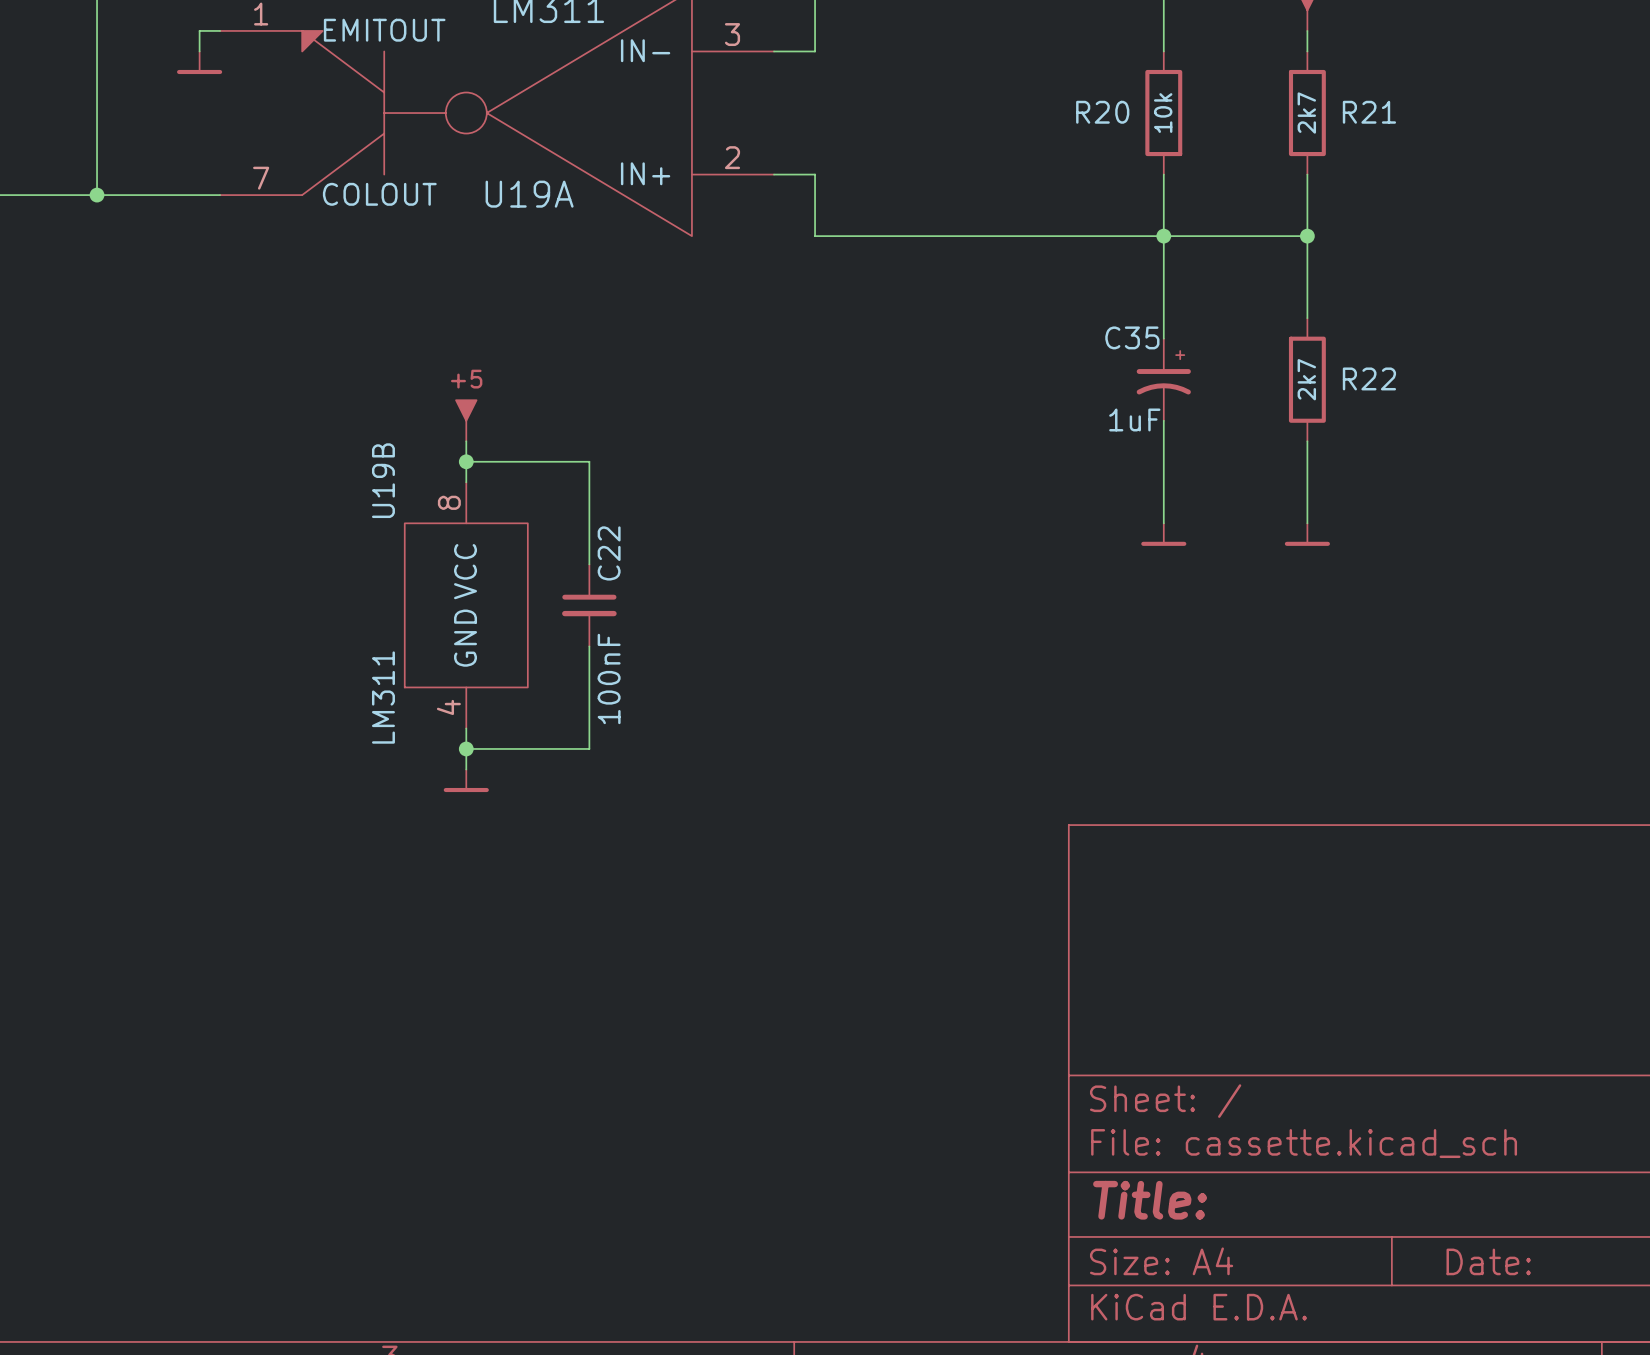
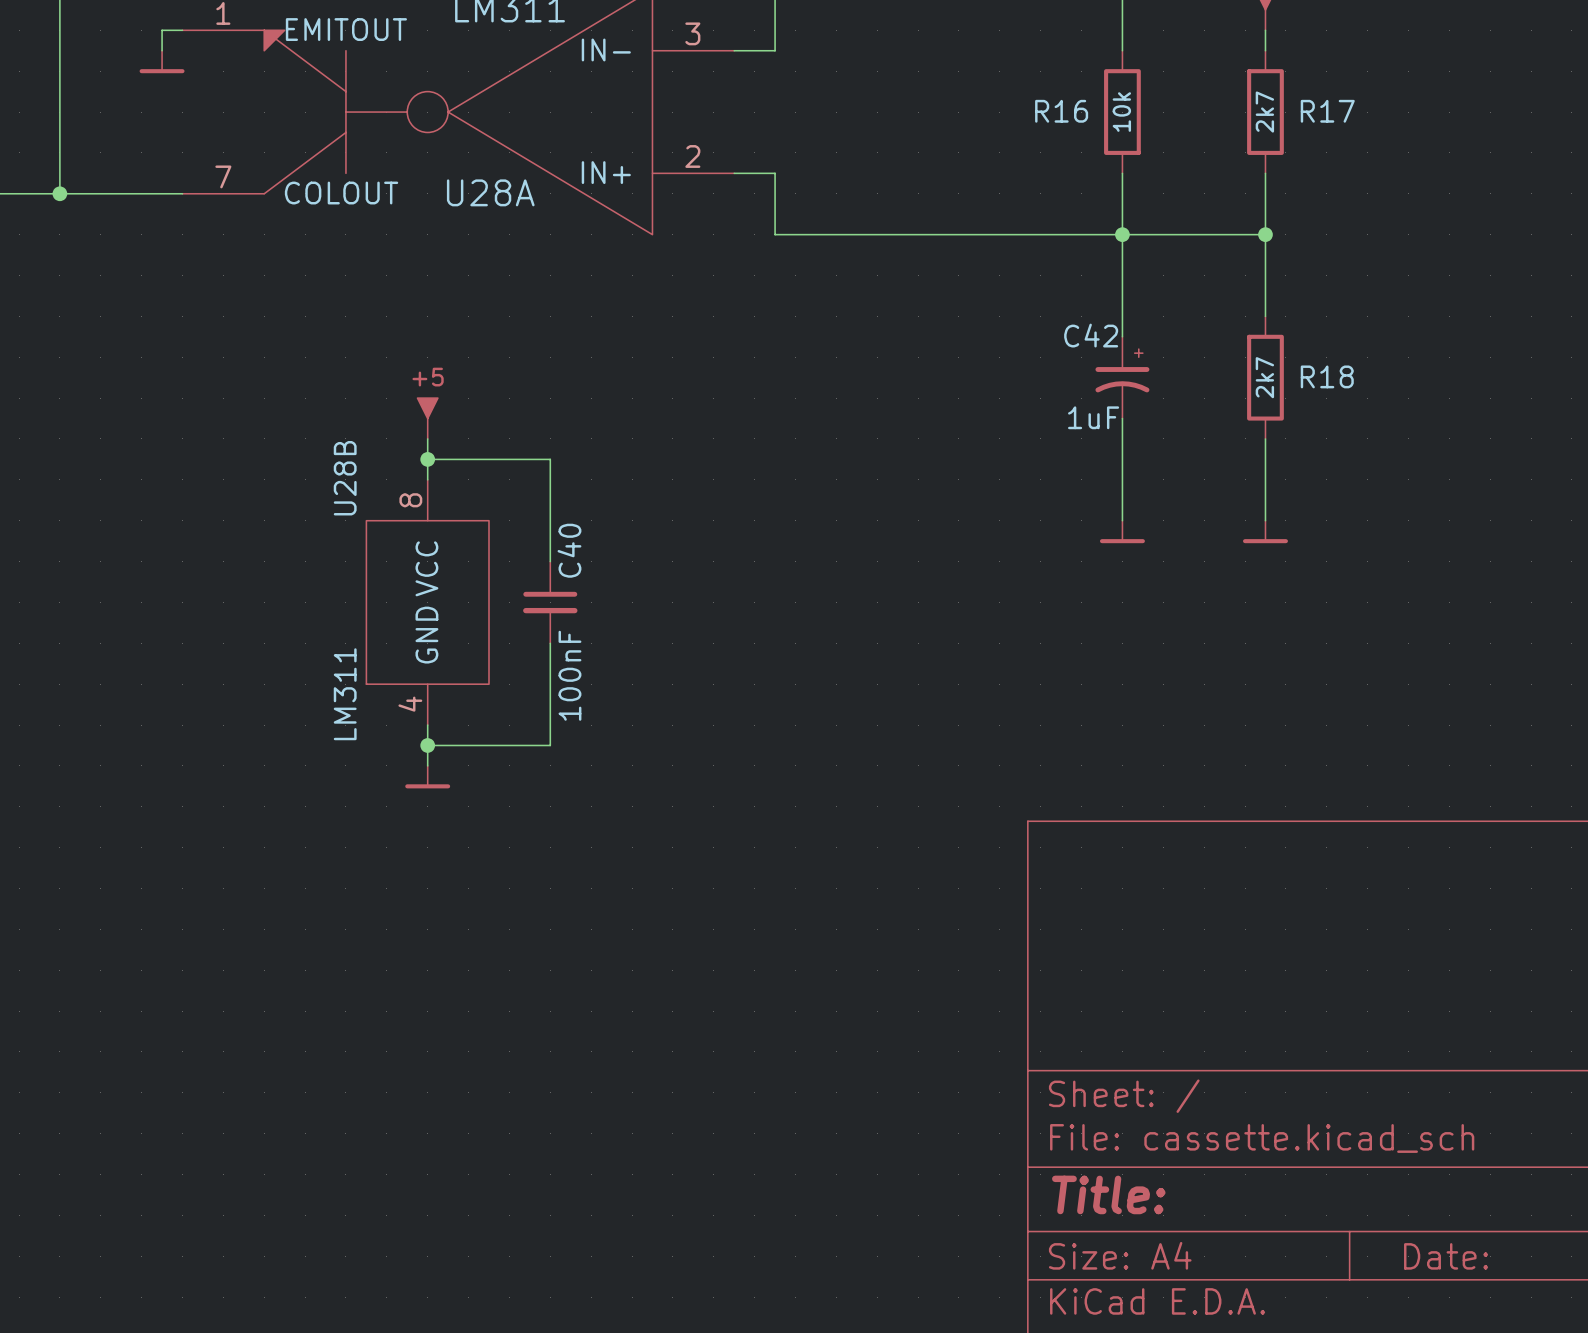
R20 name: R20 (1102, 112) -> R16 (1061, 111)
R21 name: R21 (1369, 112) -> R17 (1327, 111)
U19A name: U19A (529, 194) -> U28A (490, 192)
C35 name: C35 (1132, 337) -> C42 (1091, 335)
R22 name: R22 (1369, 378) -> R18 (1327, 376)
U19B name: U19B (383, 480) -> U28B (345, 478)
C22 name: C22 (609, 553) -> C40 (569, 550)

